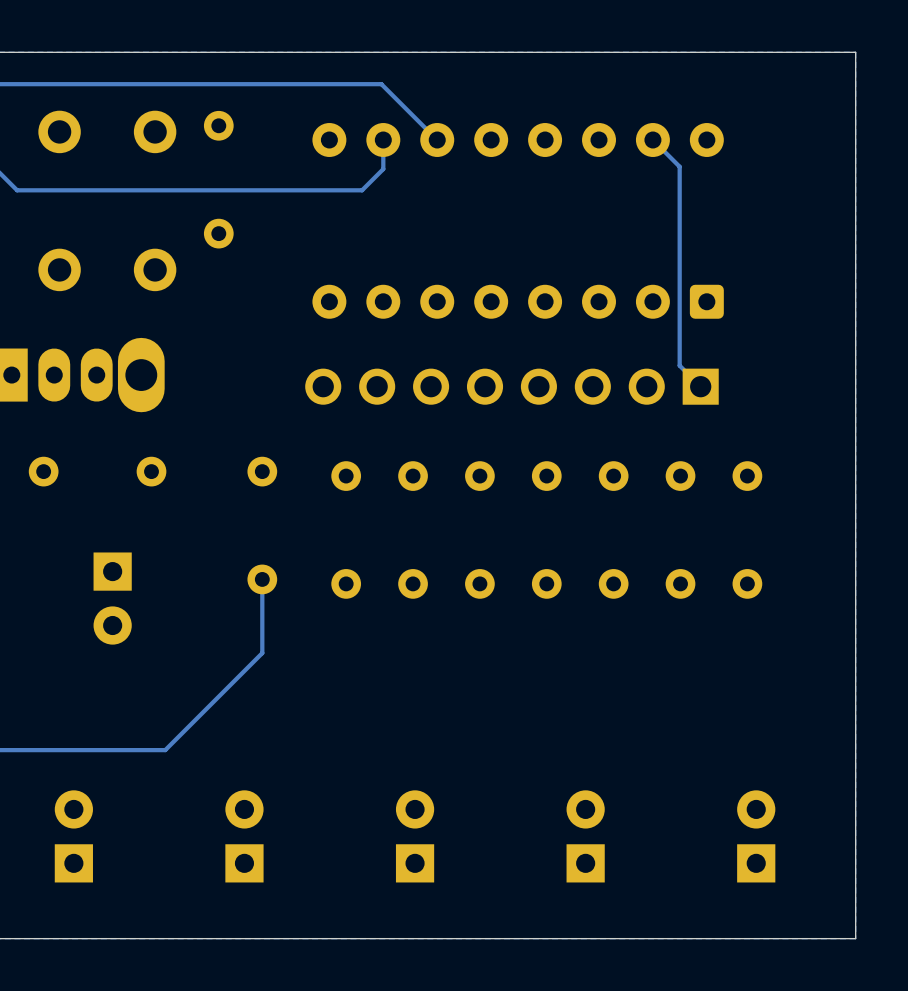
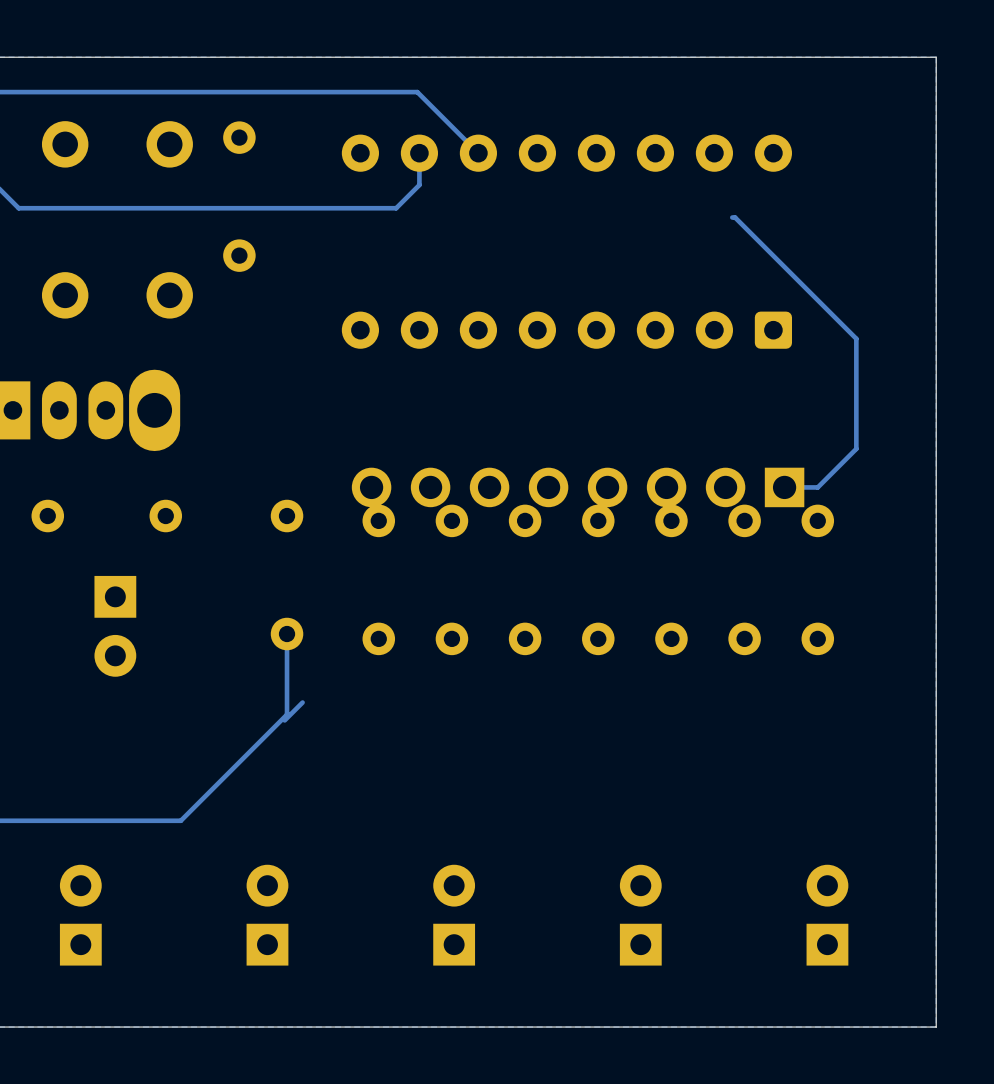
track: (652, 140) (679, 166) (679, 365) (700, 386) -> none
track: none -> (732, 217) (735, 217) (856, 338) (856, 448) (817, 487) (784, 487)
part position: (511, 386) -> (578, 487)
part position: (112, 598) -> (115, 626)
track: none -> (302, 702) (284, 720)

